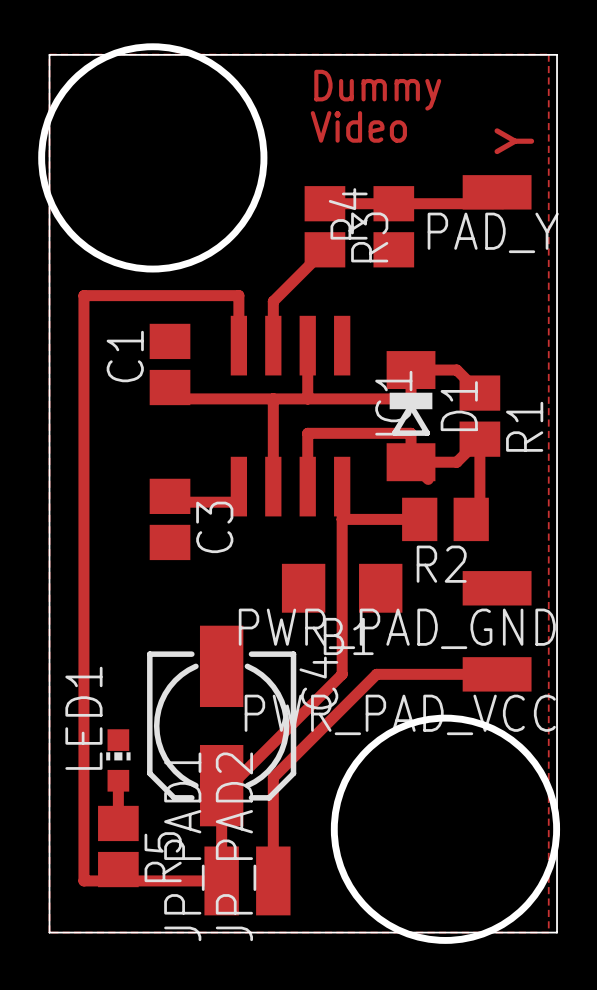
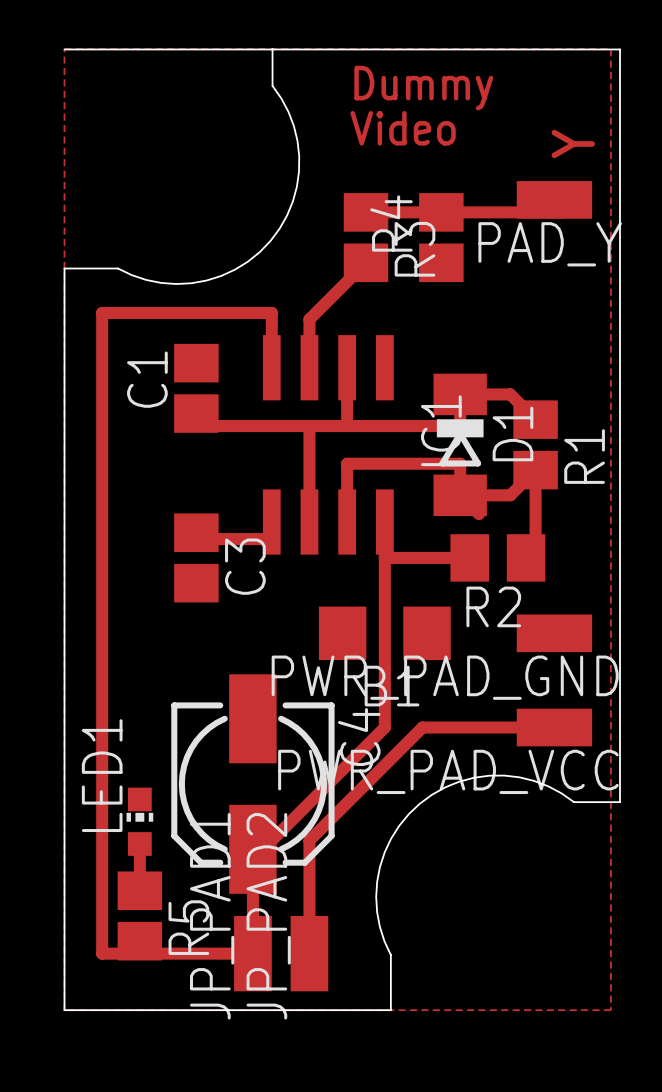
round board edge: [38, 43, 268, 273] -> none
board edge: (49, 54) (49, 254) -> (272, 49) (272, 86) (288, 111) (297, 141) (299, 156) (296, 186) (292, 201) (279, 228) (270, 240) (248, 261) (235, 269) (221, 275) (191, 283) (161, 282) (146, 279) (118, 268) (64, 268)
round board edge: [330, 714, 561, 944] -> none
board edge: (557, 742) (557, 932) (347, 932) -> (620, 802) (574, 802) (548, 786) (519, 777) (504, 775) (474, 777) (459, 781) (432, 794) (419, 803) (399, 825) (391, 838) (384, 852) (377, 881) (377, 912) (384, 941) (390, 955) (390, 1010)

